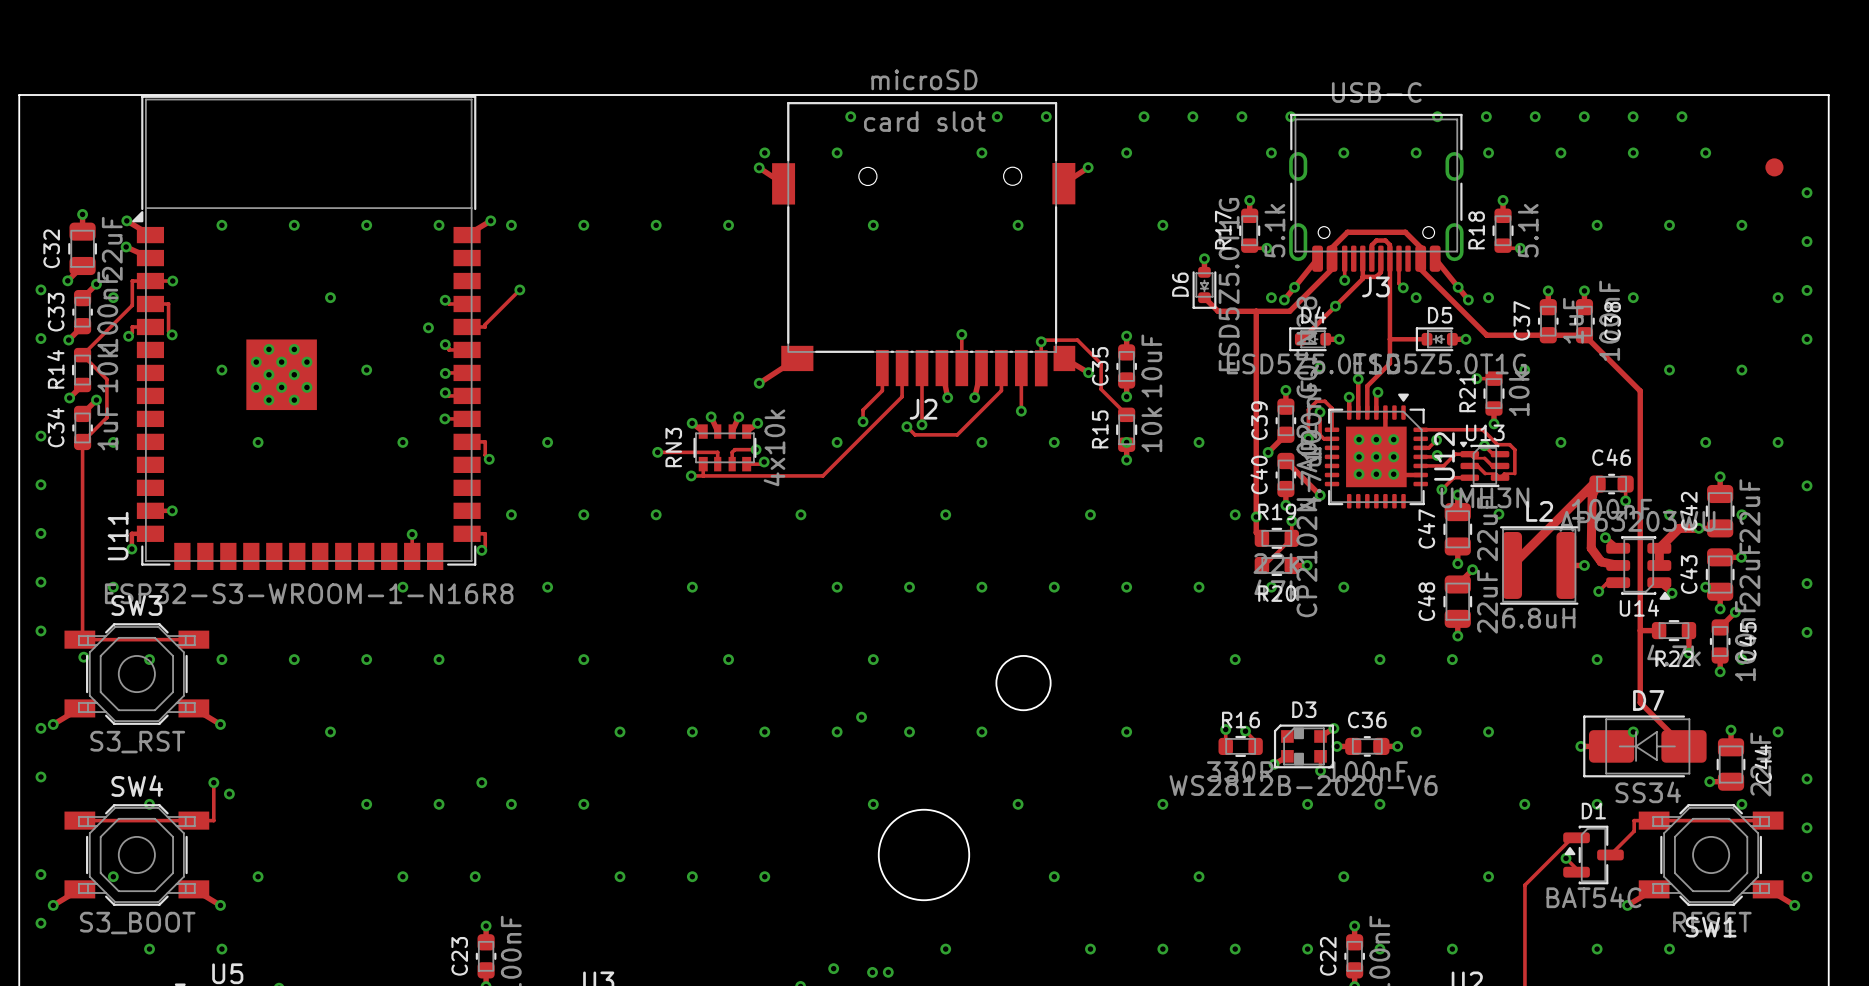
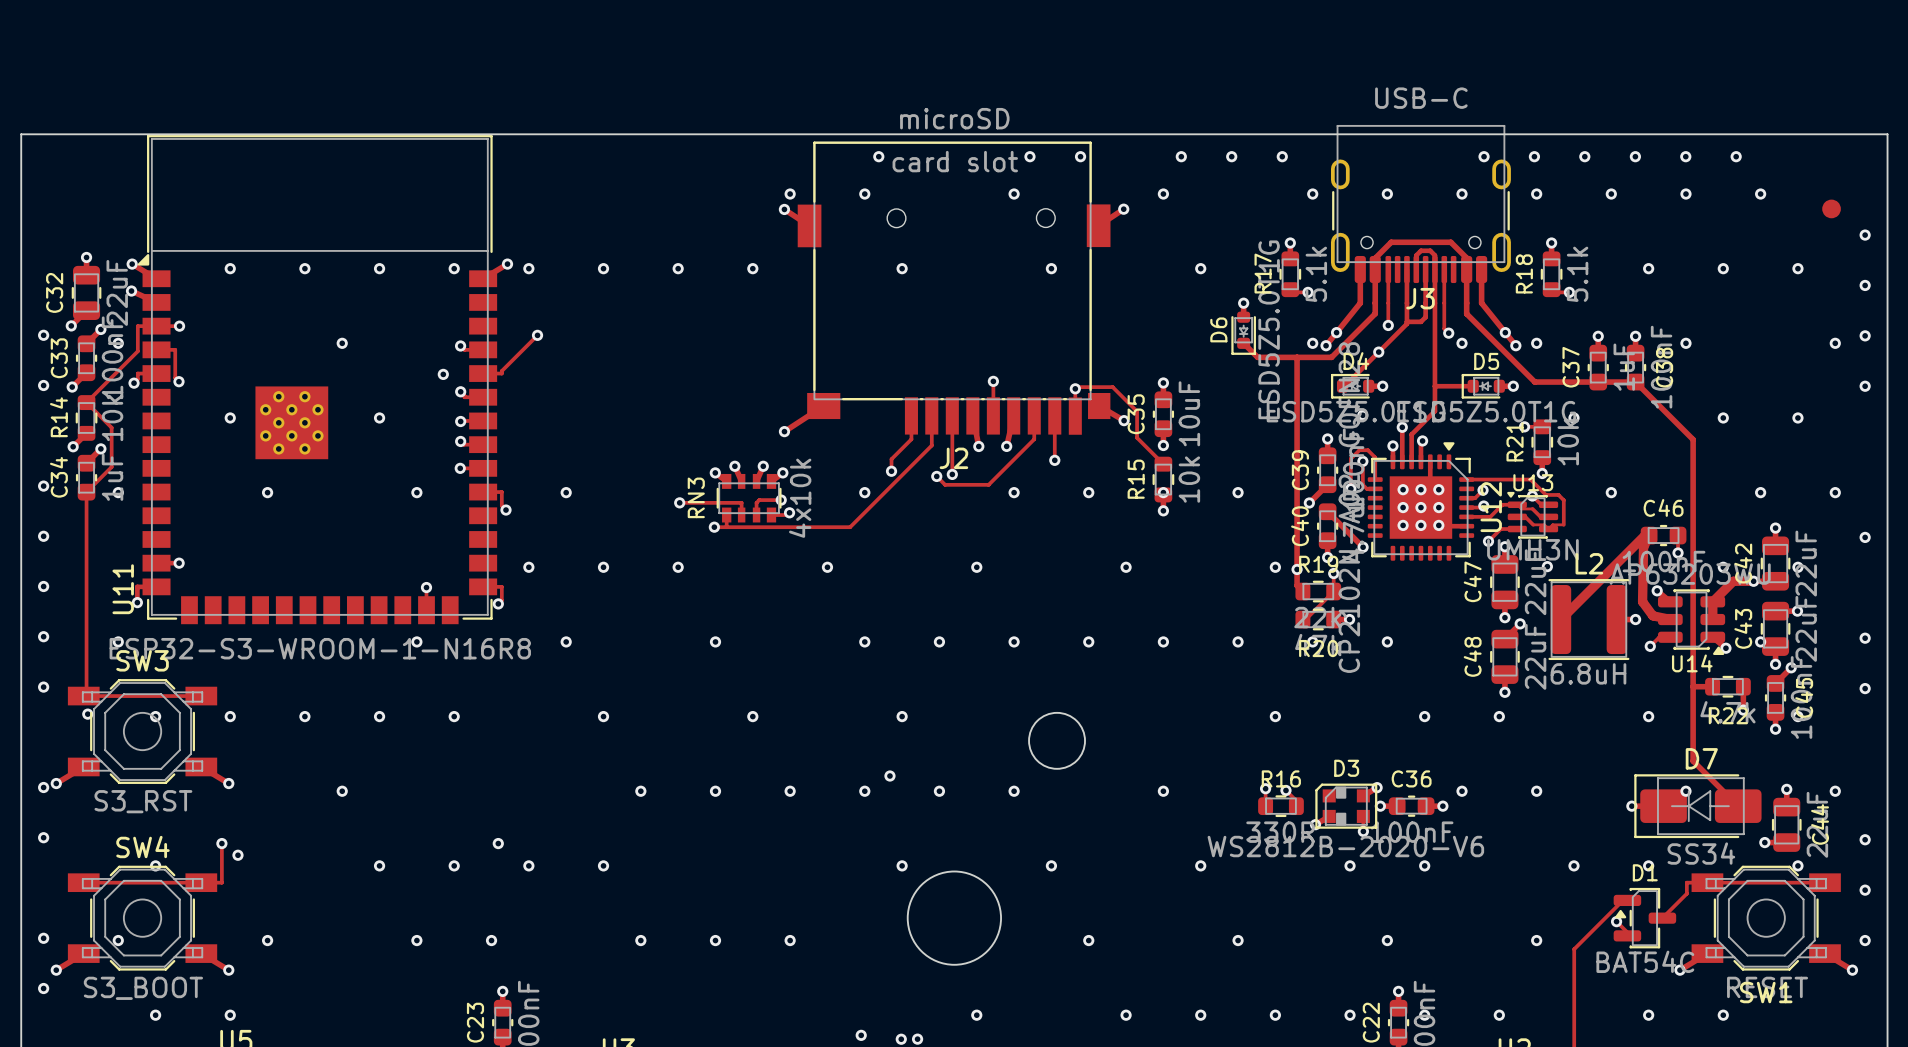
J3 footprint: [1289, 113, 1464, 272] -> [1331, 124, 1511, 284]
via: (1290, 116) -> none
track: none -> (1360, 269) (1360, 303)
track: none -> (1388, 269) (1388, 303)
track: none -> (1406, 269) (1406, 303)
track: none -> (1425, 269) (1425, 303)
track: none -> (1444, 269) (1444, 303)
track: none -> (1481, 269) (1481, 303)
track: (1389, 245) (1385, 240) (1376, 240) (1371, 245) (1371, 258) -> (1434, 289) (1434, 255) (1430, 250) (1421, 250) (1416, 255) (1416, 269)
track: (1420, 247) (1405, 232) (1347, 232) (1332, 247) -> (1466, 291) (1466, 258) (1450, 242) (1391, 242) (1375, 258) (1375, 291)

